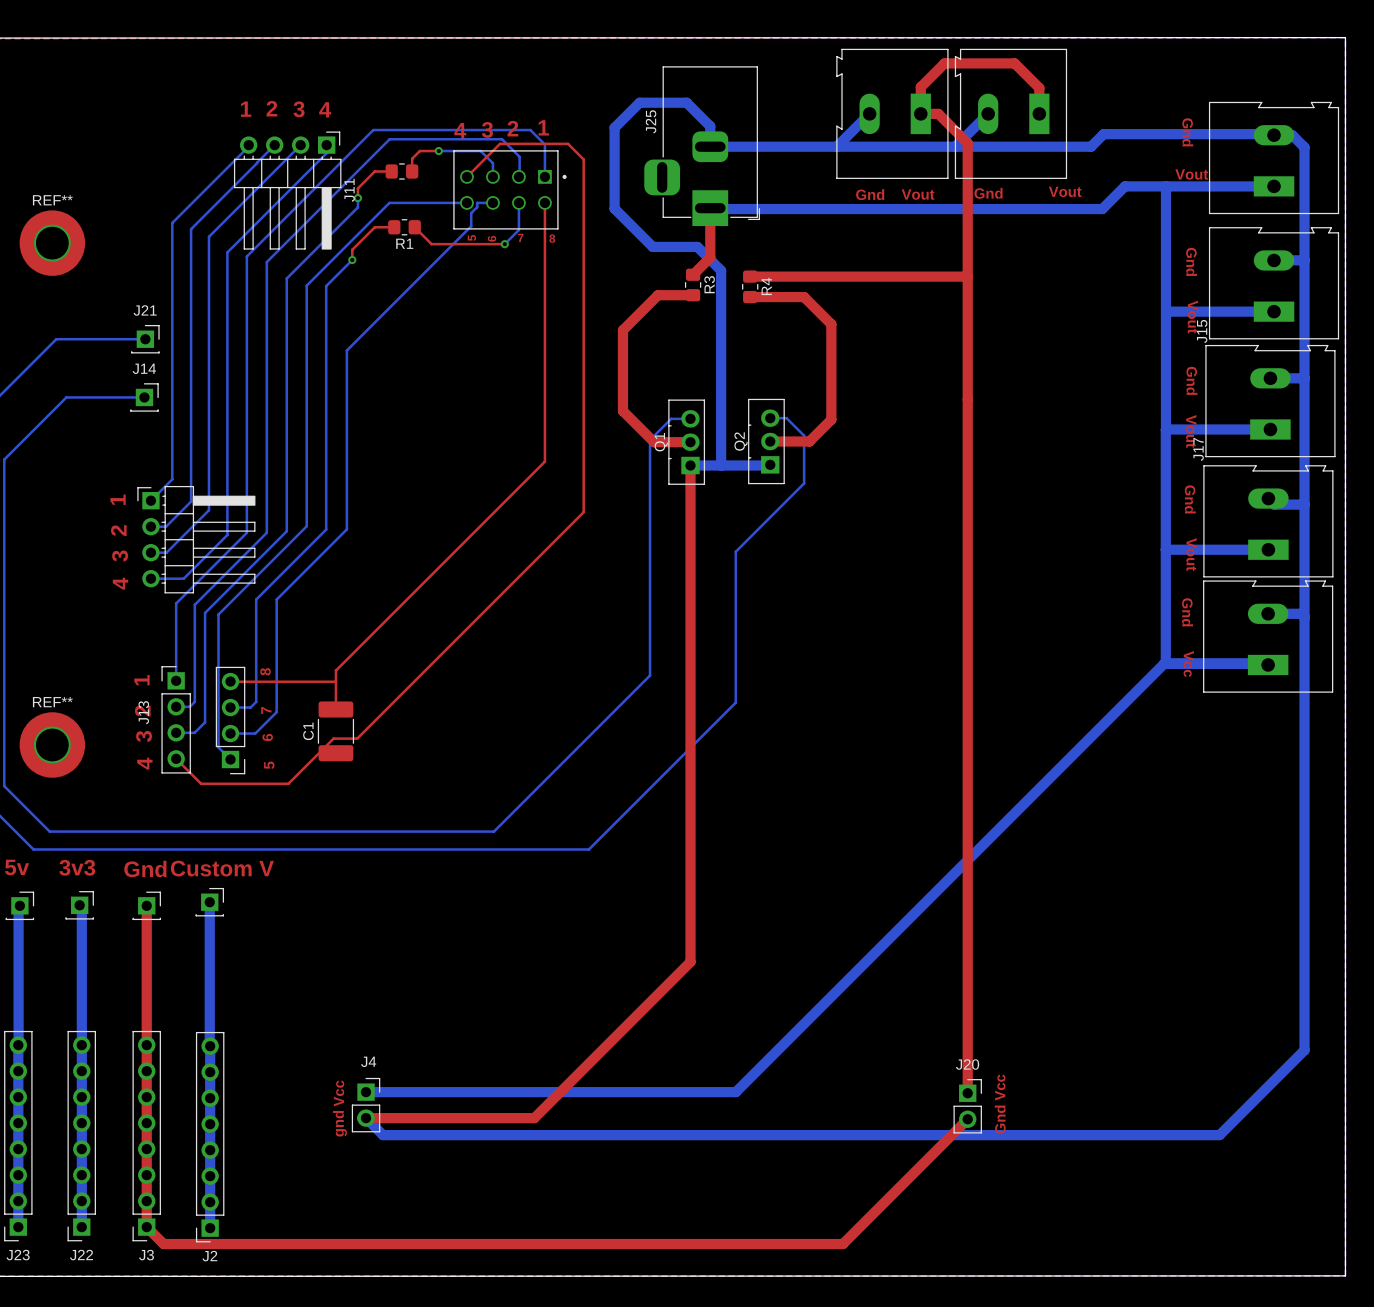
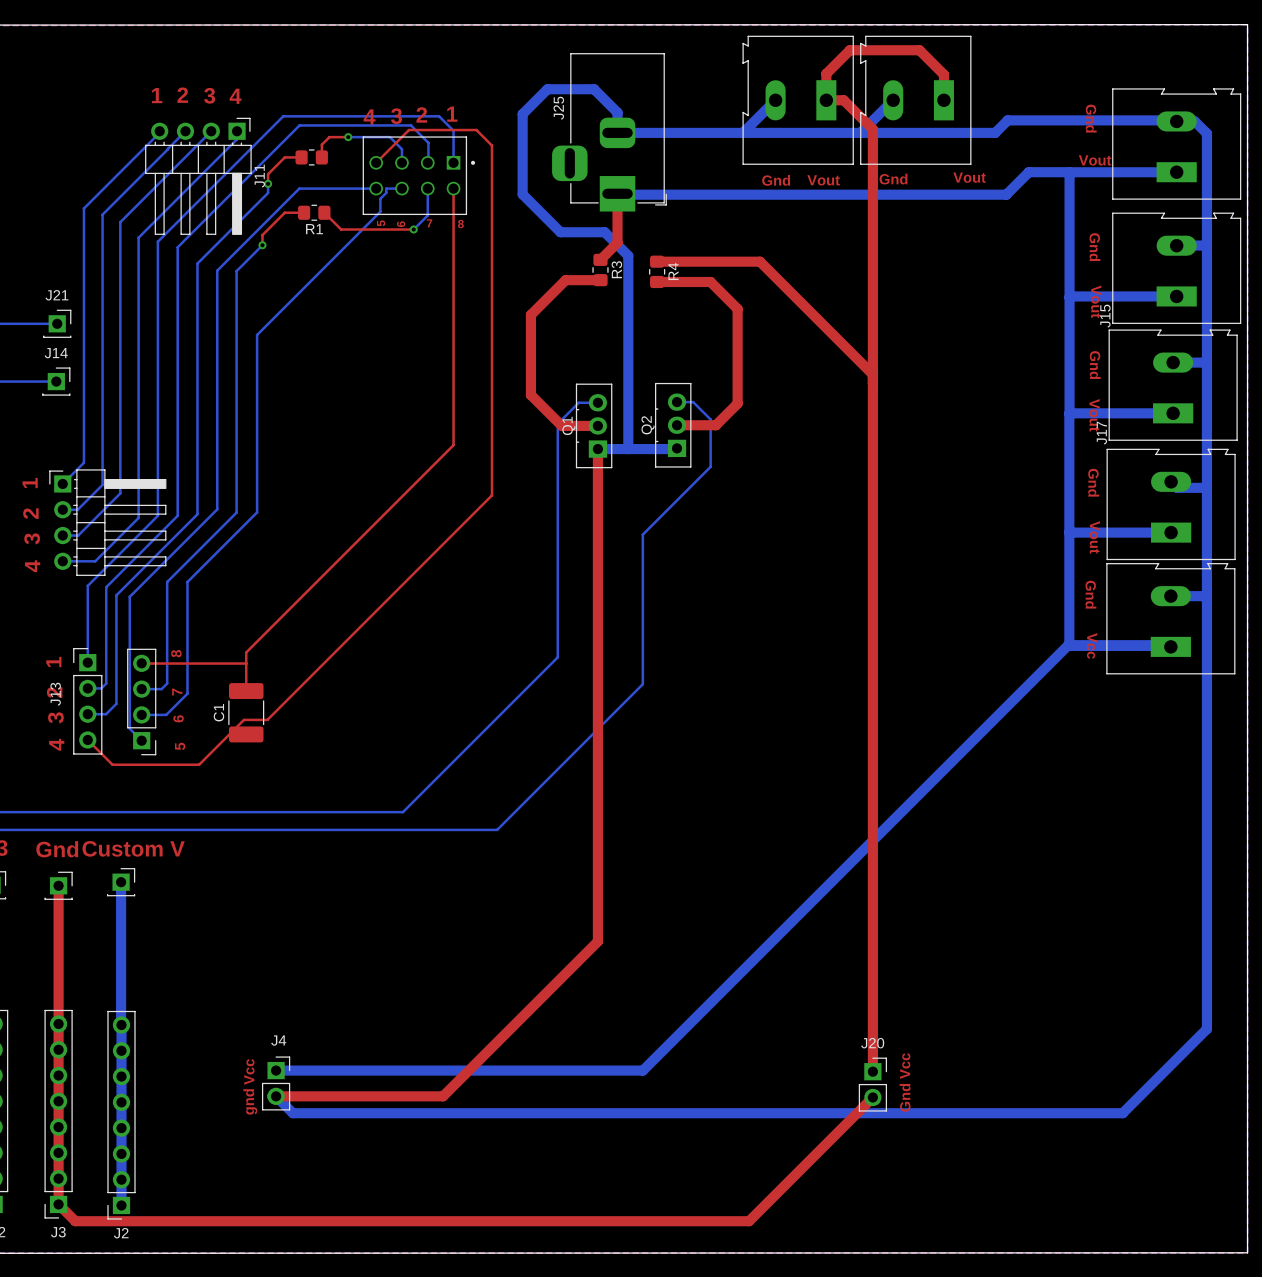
top track: (853, 276) (967, 276) -> (760, 261) (872, 374)

